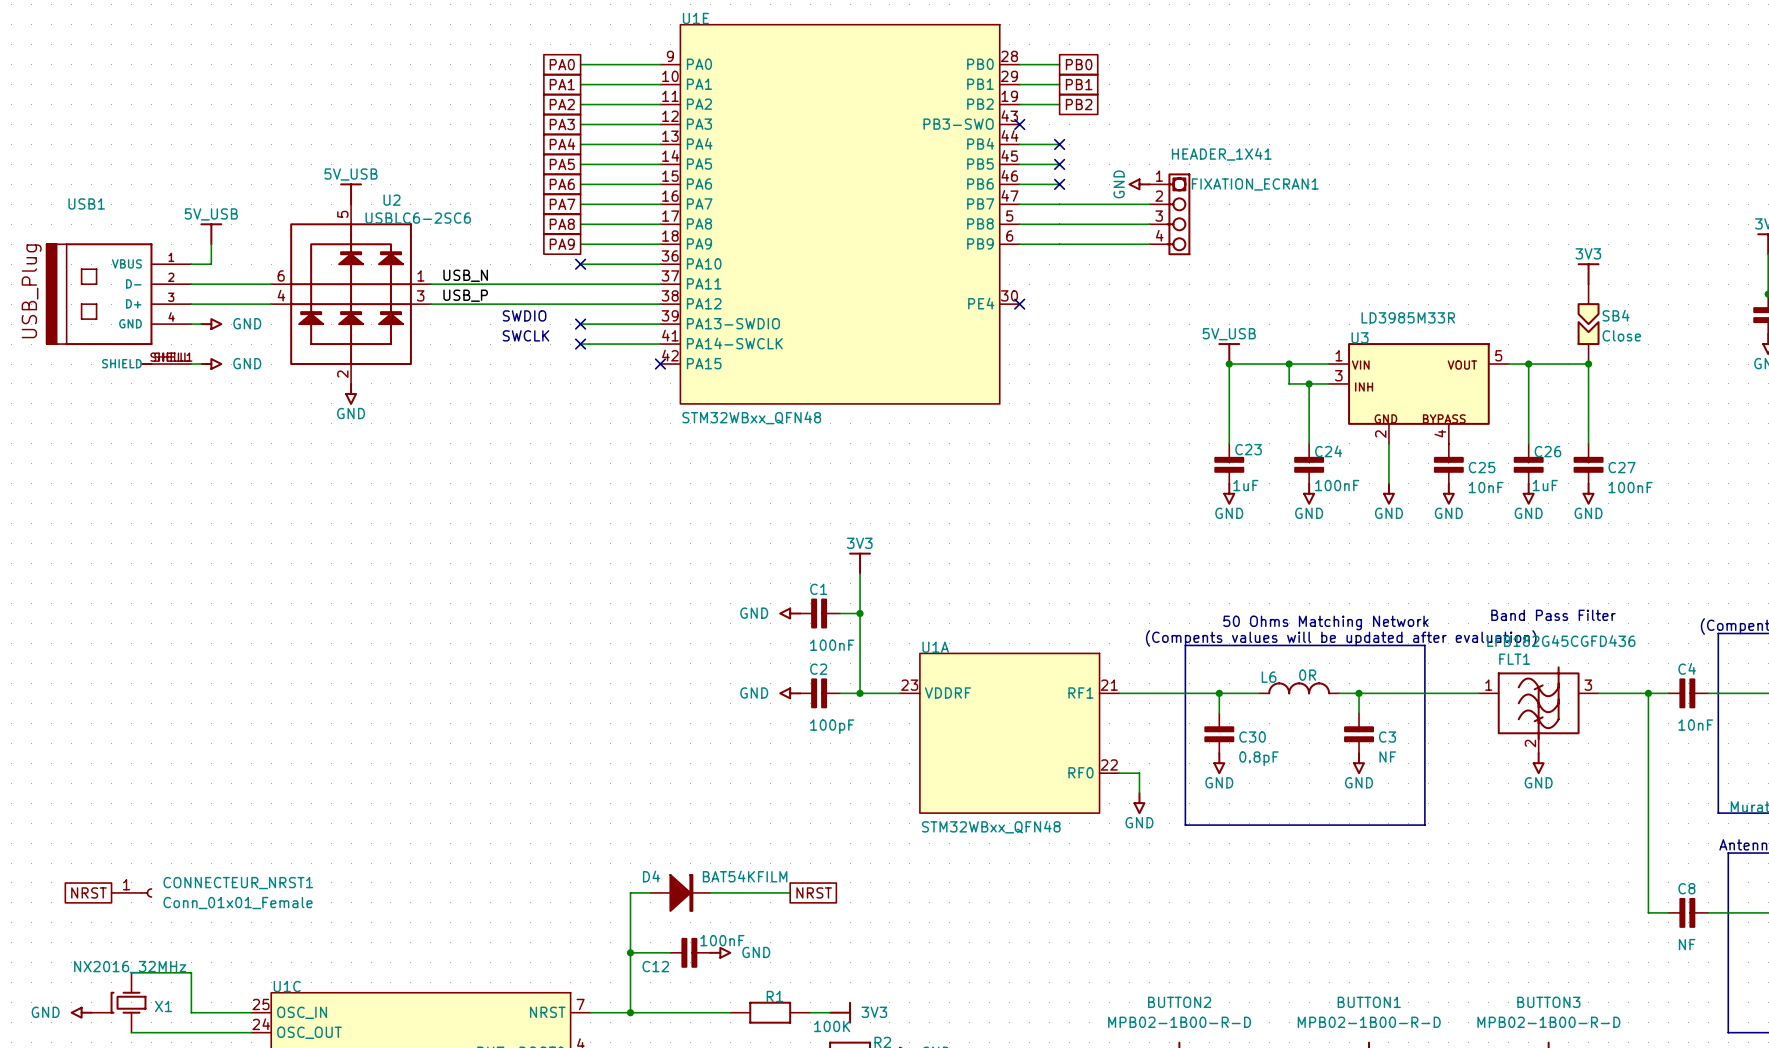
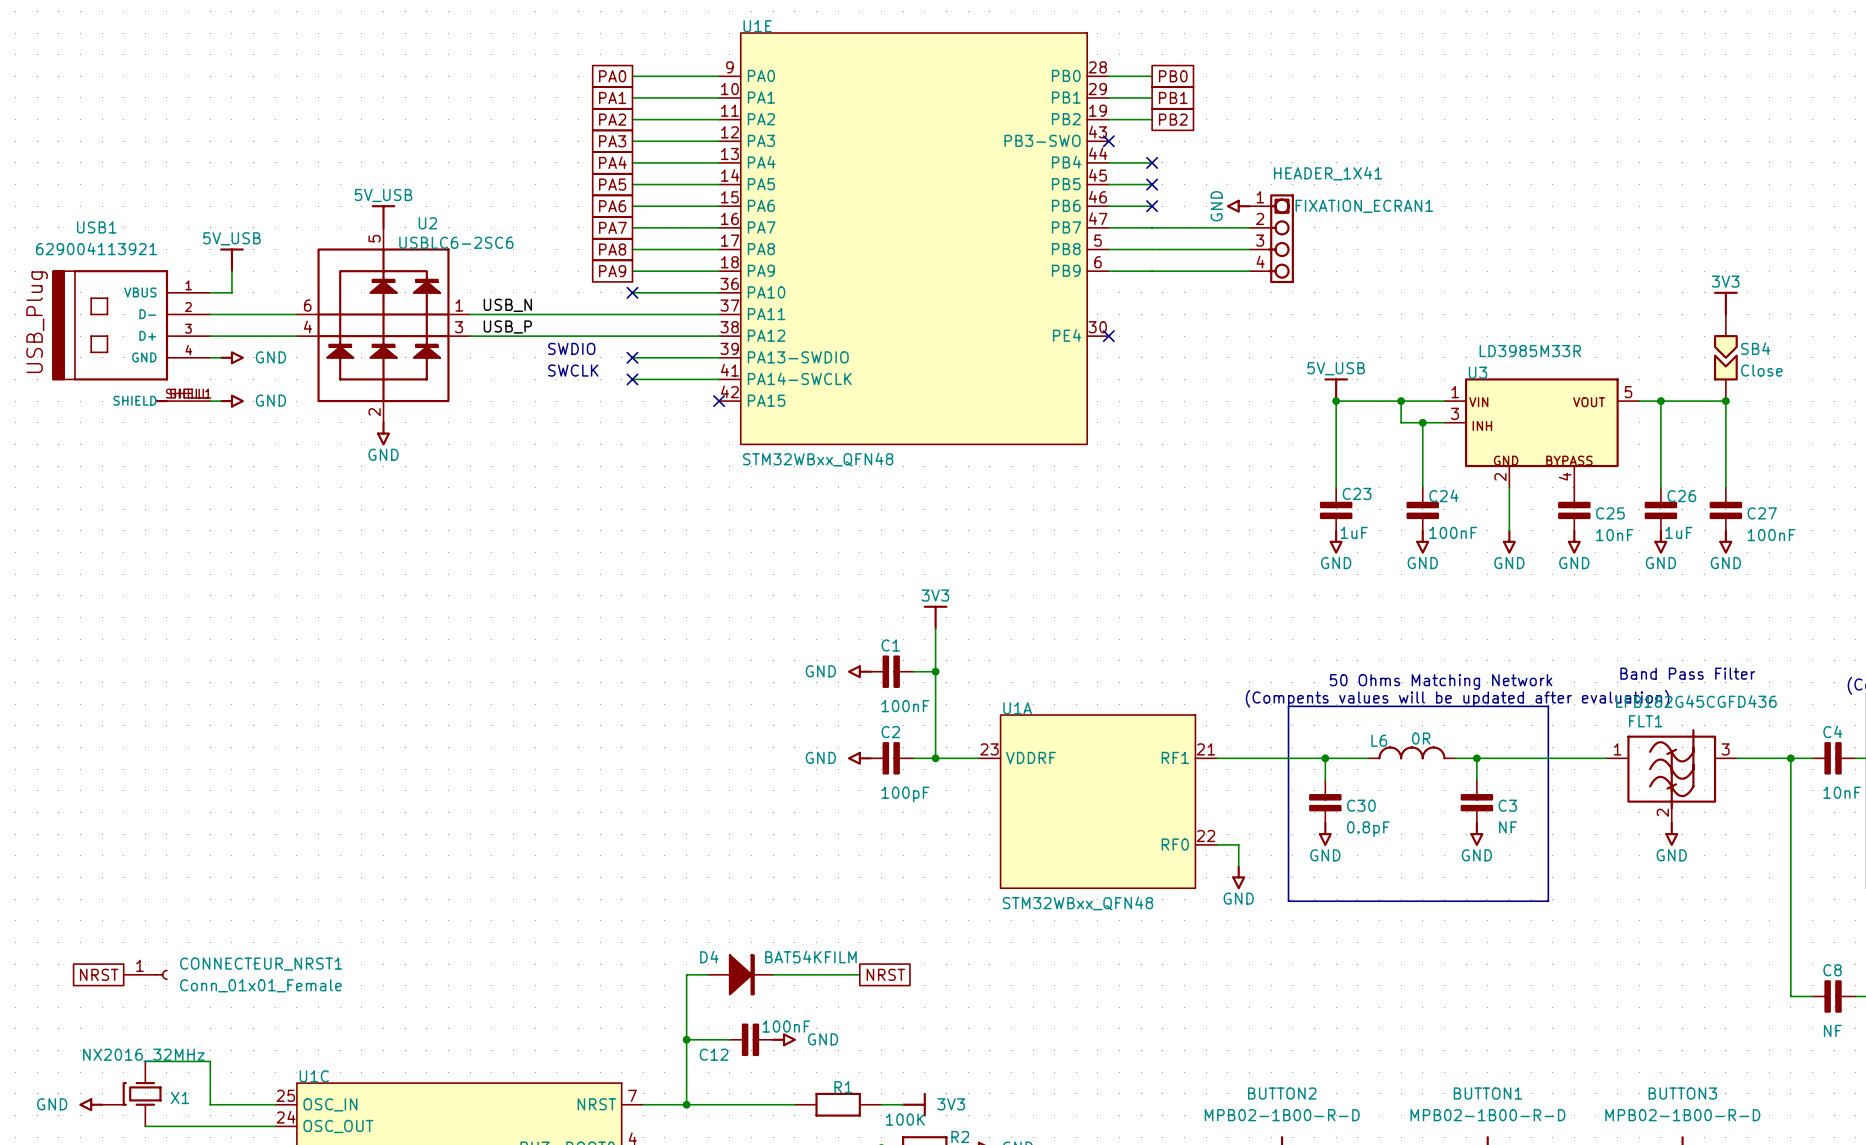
USB1 value: none -> 629004113921 (96, 248)

